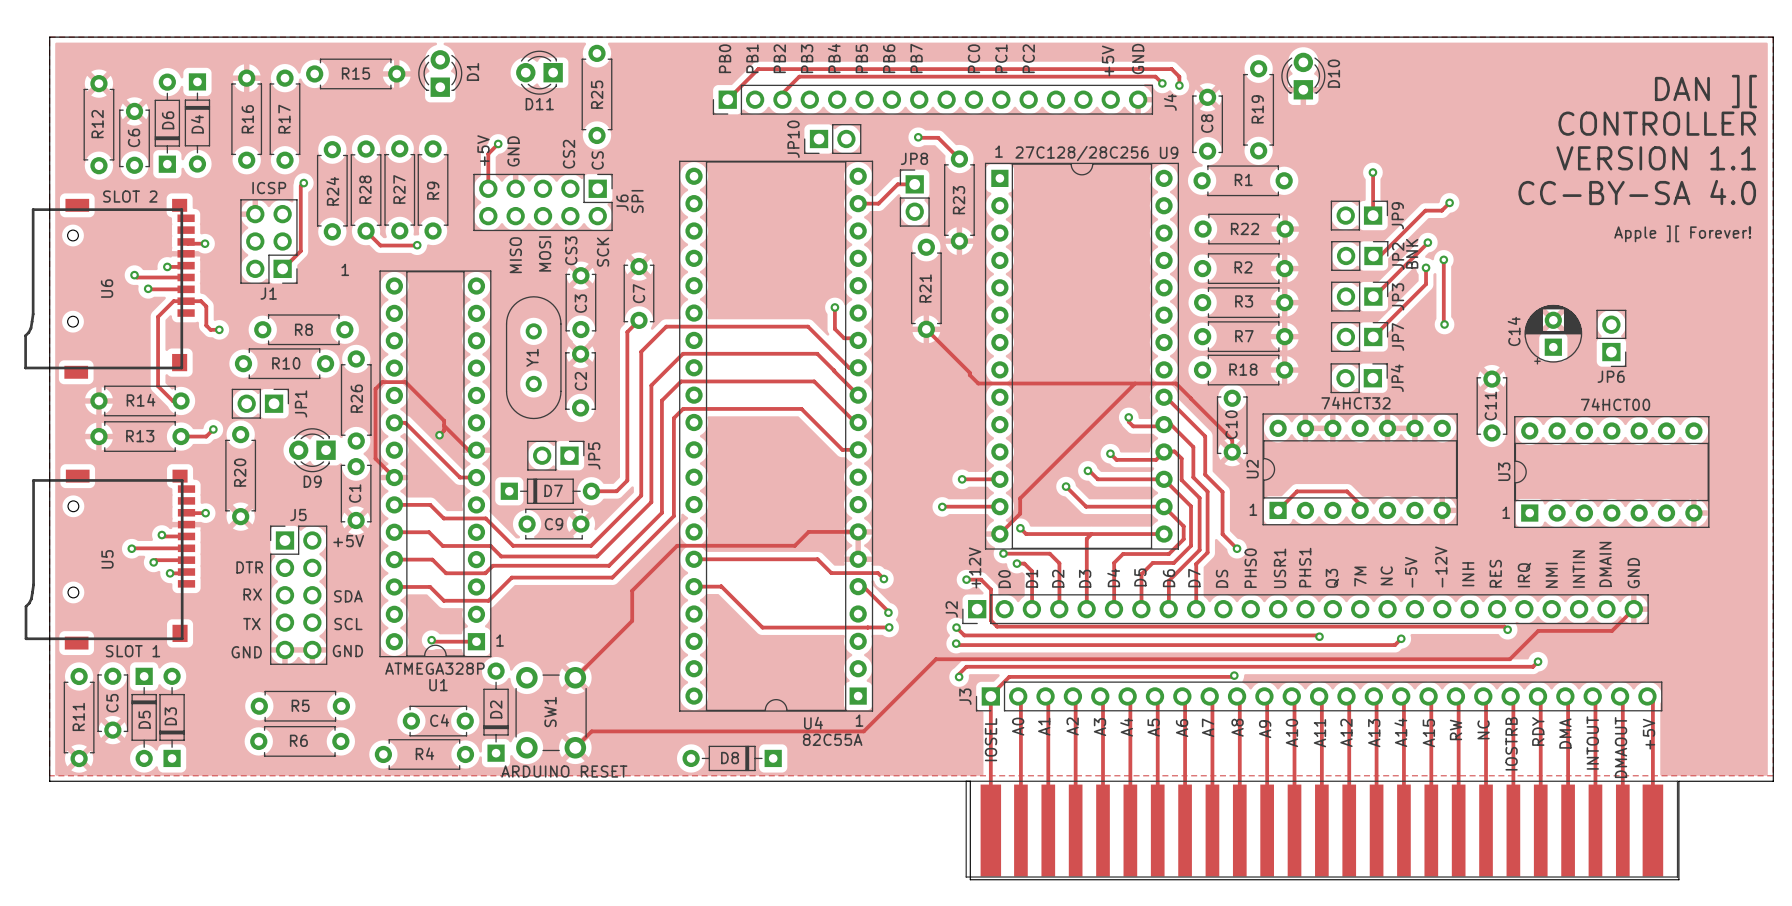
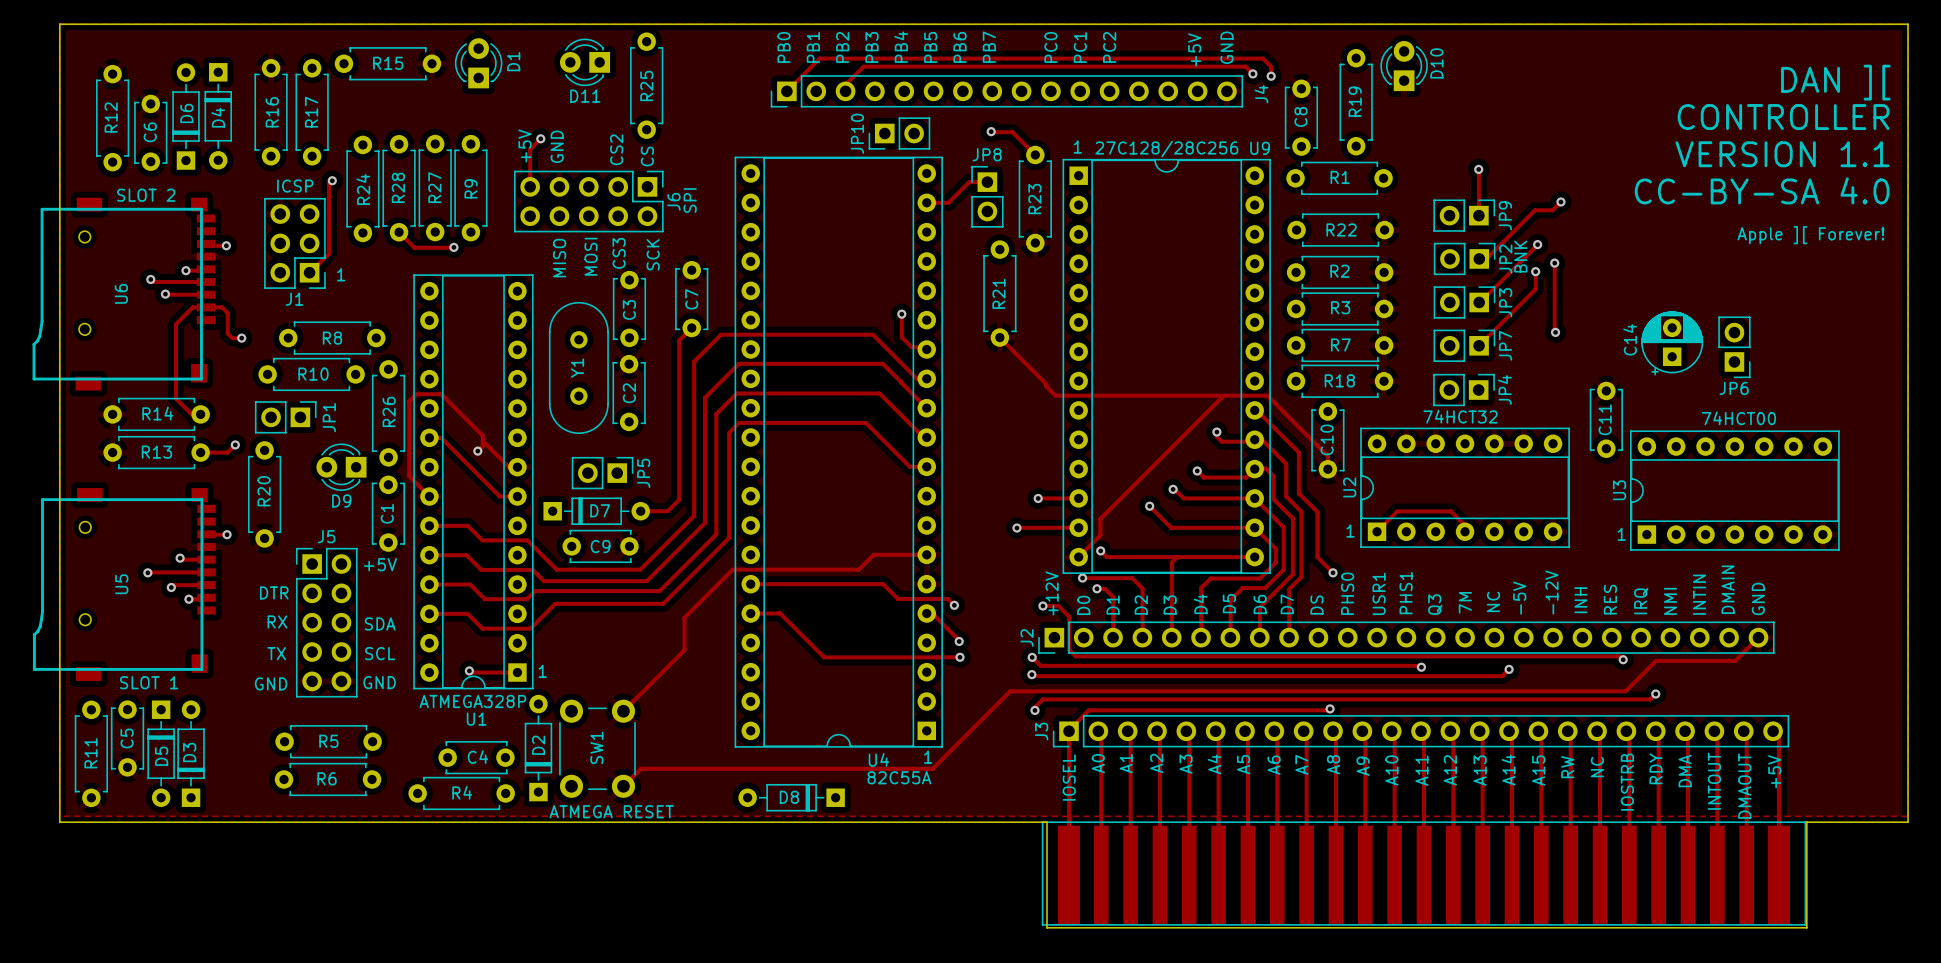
text position: 1 (345, 269) -> 1 (341, 274)
text: ARDUINO RESET (564, 771) -> ATMEGA RESET (611, 811)

